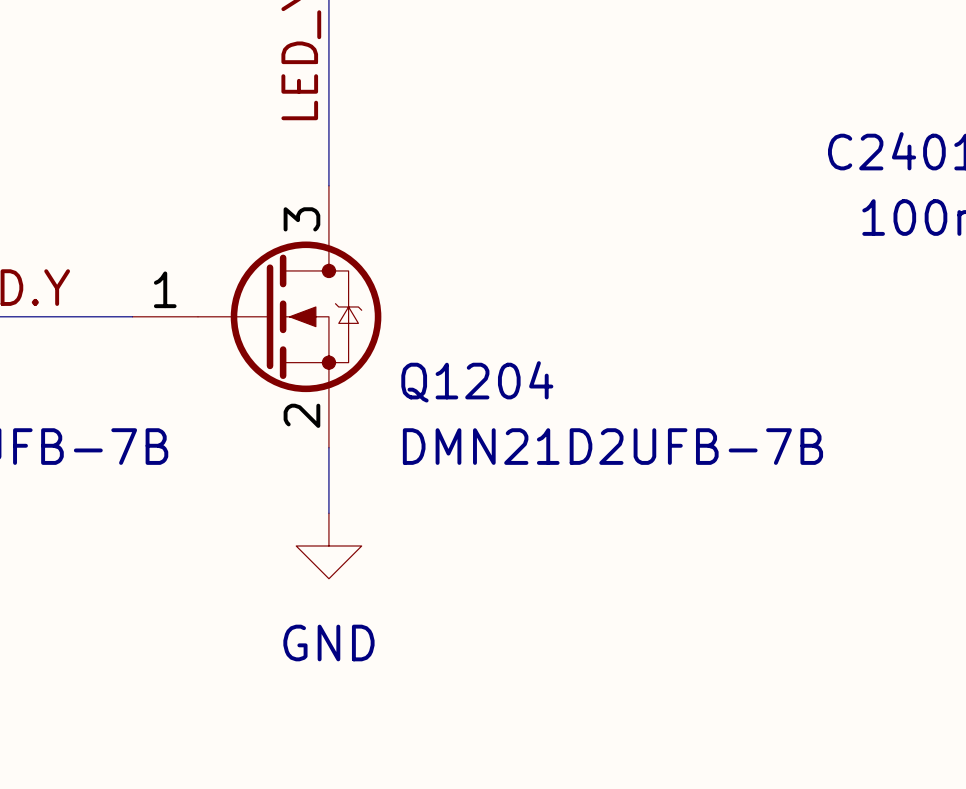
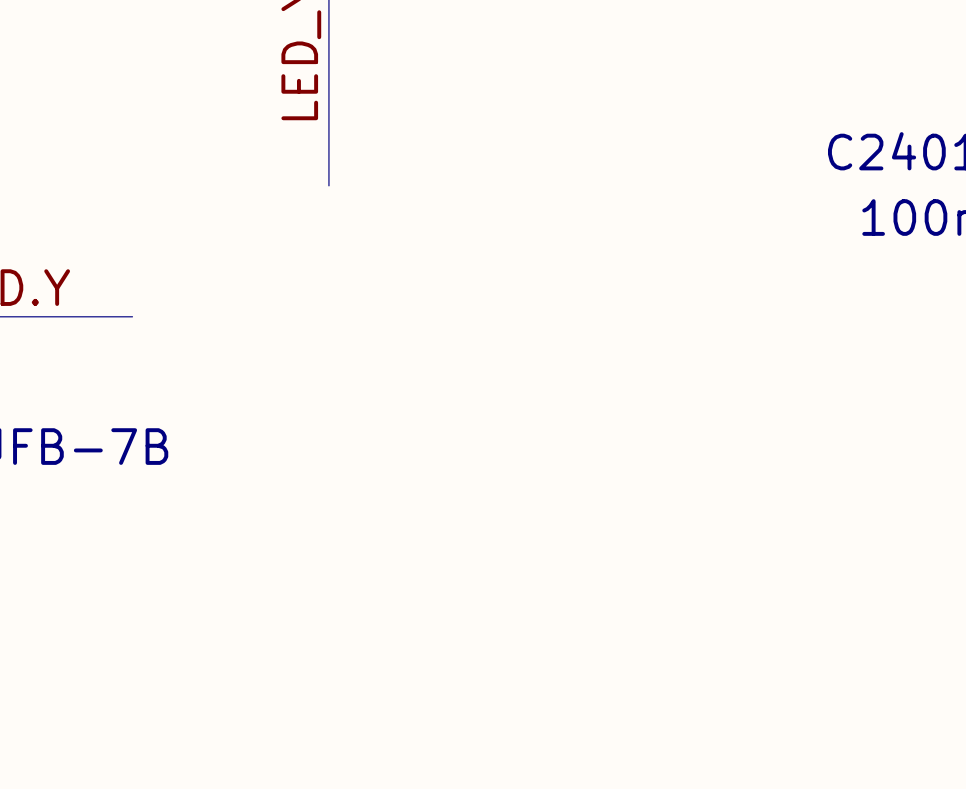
Q1204: DMN21D2UFB-7B (256, 316) -> none
wire: (328, 447) (328, 513) -> none
power symbol: GND (328, 546) -> none

